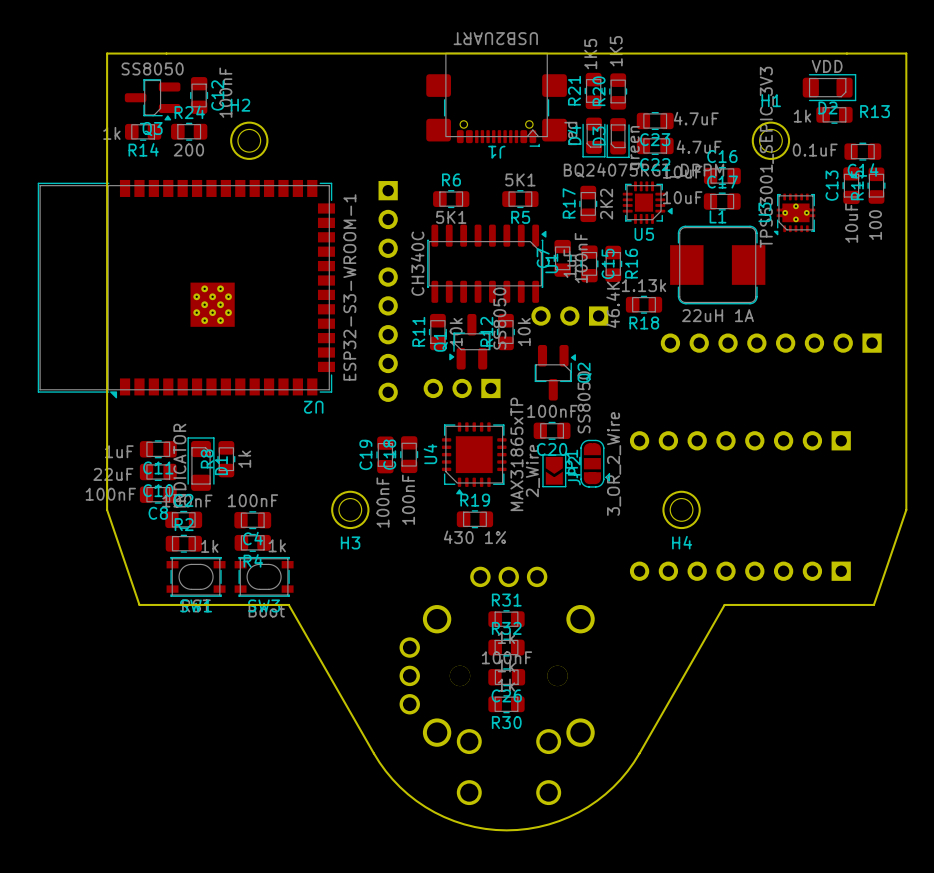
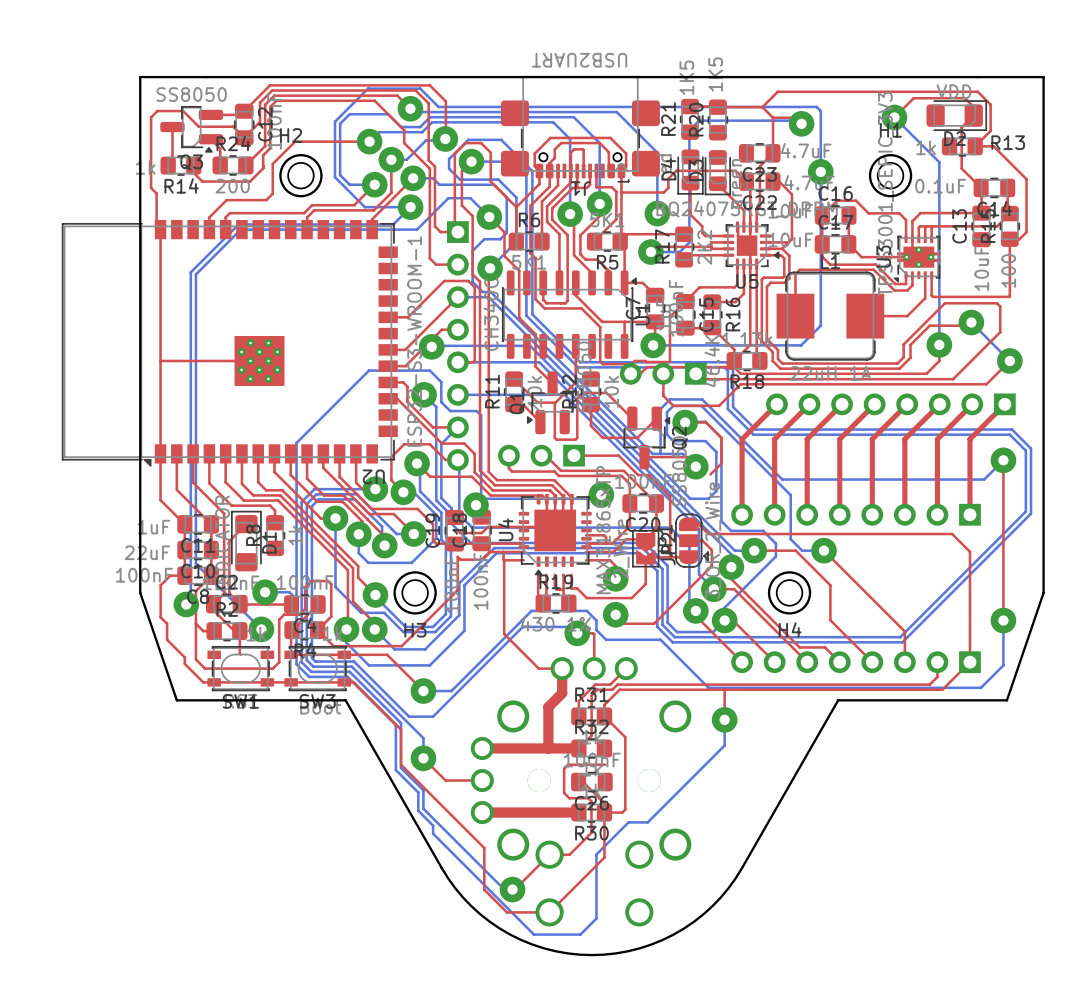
top track: none -> (690, 106) (762, 107)
top track: none -> (762, 107) (773, 117)
top track: none -> (762, 107) (777, 91) (977, 91) (990, 104) (990, 130) (975, 146) (993, 146) (1026, 179) (1026, 232) (1019, 239) (1009, 239) (1009, 296) (932, 296) (931, 275)
top track: none -> (410, 108) (397, 95) (274, 95) (265, 104) (265, 146) (245, 165)
bottom track: none -> (410, 108) (413, 112) (616, 112) (657, 152) (657, 213)
via: none -> (410, 108)
top track: none -> (210, 114) (240, 114) (270, 85) (429, 85) (445, 101) (445, 138)
top track: none -> (773, 117) (773, 153) (759, 166) (759, 207) (756, 210) (756, 227)
top track: none -> (773, 117) (795, 117) (801, 123)
top track: none -> (894, 117) (913, 98) (964, 98) (973, 106) (973, 115) (961, 127) (961, 168) (981, 188) (981, 213) (920, 213) (912, 221) (912, 250) (918, 257) (861, 257) (848, 244) (848, 215)
bottom track: none -> (894, 117) (939, 162) (939, 344)
via: none -> (894, 117)
bottom track: none -> (801, 123) (798, 120) (699, 120) (689, 130) (689, 242) (679, 252) (650, 252)
via: none -> (801, 123)
top track: none -> (172, 127) (172, 161) (168, 165)
top track: none -> (210, 139) (220, 148) (220, 165)
bottom track: none -> (445, 138) (426, 140) (406, 159) (391, 159)
via: none -> (445, 138)
top track: none -> (369, 141) (295, 141) (272, 163) (272, 193) (266, 200) (226, 200) (209, 217) (209, 229)
bottom track: none -> (369, 141) (379, 132) (422, 132) (432, 122) (553, 122) (570, 139) (570, 214)
via: none -> (369, 141)
top track: none -> (391, 159) (391, 192) (373, 210) (314, 210) (307, 217) (307, 229)
via: none -> (391, 159)
top track: none -> (471, 161) (461, 171) (461, 205) (472, 216) (472, 274) (480, 281) (480, 470) (494, 485) (552, 485) (563, 496) (563, 512)
bottom track: none -> (471, 161) (515, 161) (526, 172) (526, 315) (578, 367) (724, 367) (727, 370) (727, 409) (753, 434) (1009, 434) (1025, 450) (1025, 511) (900, 637) (674, 637) (662, 624) (662, 569) (642, 548) (494, 548) (459, 583) (459, 615) (425, 649) (394, 649) (374, 629)
via: none -> (471, 161)
top track: none -> (193, 165) (193, 172) (202, 181) (250, 181) (263, 168) (263, 155) (270, 148) (270, 106) (276, 100) (374, 100) (404, 130) (404, 143) (429, 168) (429, 258) (436, 264) (457, 264)
top track: none -> (558, 171) (558, 185) (542, 201) (542, 241)
top track: none -> (577, 171) (577, 187)
top track: none -> (583, 171) (583, 150) (574, 149) (570, 152) (570, 182) (547, 206) (547, 221) (559, 234) (559, 282)
top track: none -> (590, 171) (590, 184) (586, 187) (572, 187) (552, 208) (552, 219) (567, 235) (567, 301) (565, 303) (546, 303) (543, 299) (543, 282)
top track: none -> (596, 171) (596, 187) (611, 187) (616, 191) (616, 219) (594, 241)
top track: none -> (611, 171) (608, 168) (608, 152) (599, 143) (561, 143) (554, 149) (554, 158) (549, 163) (549, 186) (530, 205) (530, 253) (535, 258) (535, 299) (544, 308) (581, 308) (600, 327) (600, 361) (602, 364) (631, 364) (634, 360) (669, 362) (669, 316) (699, 287) (734, 287) (737, 284) (737, 264)
via: none -> (820, 171)
top track: none -> (413, 178) (372, 219) (372, 229)
bottom track: none -> (413, 178) (433, 178) (439, 184) (493, 184) (506, 197) (506, 232) (500, 239) (484, 239) (472, 250) (472, 282) (482, 292) (490, 292) (652, 453) (682, 453) (695, 466)
via: none -> (413, 178)
top track: none -> (773, 181) (779, 181) (791, 194) (791, 239) (782, 248)
top track: none -> (690, 183) (690, 214) (702, 226) (702, 232) (705, 236) (728, 236)
top track: none -> (717, 183) (743, 210) (743, 227)
top track: none -> (374, 184) (354, 205) (312, 205) (304, 213) (229, 213) (225, 217) (225, 229)
bottom track: none -> (374, 184) (349, 184) (340, 175) (340, 123) (349, 114) (388, 114) (401, 127) (420, 127) (430, 117) (573, 117) (599, 143) (599, 203)
via: none -> (374, 184)
top track: none -> (1007, 187) (1009, 213) (997, 226) (920, 226) (918, 239)
top track: none -> (621, 192) (663, 192) (668, 187) (668, 178) (676, 170) (735, 170) (750, 185) (750, 242)
top track: none -> (599, 203) (599, 216) (580, 235) (580, 254) (585, 259) (597, 259) (608, 270) (608, 282)
via: none -> (599, 203)
via: none -> (410, 207)
top track: none -> (516, 207) (516, 241)
top track: none -> (516, 207) (490, 181) (490, 152) (481, 143) (465, 143) (454, 153) (454, 228) (457, 232) (440, 232) (434, 226) (434, 166) (428, 160) (428, 103) (415, 90) (272, 90) (260, 102) (260, 122) (244, 137) (233, 126) (198, 126) (183, 111) (157, 111) (151, 117) (151, 187) (156, 193) (156, 225) (160, 229) (160, 500) (184, 524) (184, 575) (170, 575) (160, 585) (160, 617) (167, 623) (167, 639) (184, 657) (184, 663) (203, 682) (353, 682) (401, 729) (401, 764) (484, 848) (484, 889) (507, 912) (549, 912) (604, 857) (604, 803) (583, 782) (578, 782)
top track: none -> (516, 207) (539, 184) (539, 171) (534, 166) (534, 153) (550, 137) (610, 137) (626, 153) (626, 166) (621, 171) (621, 240)
top track: none -> (570, 214) (574, 218) (574, 255) (592, 273) (592, 282)
via: none -> (570, 214)
via: none -> (657, 213)
top track: none -> (489, 217) (504, 232) (504, 256) (519, 270) (519, 317) (535, 334) (535, 366) (552, 383)
bottom track: none -> (489, 217) (470, 198) (448, 198) (417, 229) (240, 229) (195, 274) (195, 563) (261, 629)
via: none -> (489, 217)
top track: none -> (926, 226) (925, 239)
top track: none -> (932, 226) (931, 239)
top track: none -> (737, 227) (738, 236) (750, 248) (750, 344) (728, 367) (646, 367) (630, 383)
top track: none -> (684, 234) (627, 234) (620, 241) (624, 246) (624, 282) (642, 282) (655, 295)
top track: none -> (906, 239) (906, 219) (899, 213) (868, 213) (856, 200) (837, 200) (822, 215) (822, 256) (830, 264) (875, 264) (895, 284) (906, 284) (906, 275)
top track: none -> (711, 242) (711, 248) (728, 248)
top track: none -> (711, 242) (728, 242)
top track: none -> (765, 242) (788, 242)
top track: none -> (711, 246) (656, 246) (650, 252)
top track: none -> (765, 248) (782, 248)
top track: none -> (782, 248) (789, 255) (789, 278) (785, 282) (770, 282) (766, 286) (766, 338) (777, 349) (777, 358) (782, 363) (897, 363) (903, 357) (903, 344) (944, 303) (997, 303) (1000, 306) (1000, 332) (953, 379) (700, 379) (695, 383) (695, 373)
via: none -> (650, 252)
top track: none -> (728, 255) (688, 255) (684, 259)
top track: none -> (765, 255) (781, 255) (784, 258) (782, 277) (763, 277) (761, 279) (761, 341) (772, 352) (772, 360) (780, 368) (899, 368) (910, 357) (910, 344) (929, 325) (968, 325) (971, 322)
top track: none -> (743, 264) (743, 293) (735, 302) (712, 302)
top track: none -> (756, 264) (756, 357) (759, 360)
top track: none -> (490, 268) (488, 471) (497, 480) (554, 480) (571, 497) (571, 512)
bottom track: none -> (490, 268) (516, 242) (516, 197) (498, 179) (459, 179) (449, 168) (449, 159) (468, 139) (501, 139) (532, 171) (532, 314) (580, 362) (726, 362) (733, 368) (733, 407) (755, 429) (1011, 429) (1030, 448) (1030, 513) (902, 642) (672, 642) (657, 626) (657, 571) (639, 553) (496, 553) (464, 585) (464, 630) (429, 665) (368, 665) (346, 642) (346, 629)
via: none -> (490, 268)
top track: none -> (912, 275) (912, 285) (907, 290) (894, 290) (873, 269) (799, 269) (795, 274) (795, 316)
top track: none -> (925, 275) (925, 298) (907, 316) (865, 316)
top track: none -> (575, 282) (575, 295) (602, 321) (655, 321) (655, 343) (653, 345)
top track: none -> (457, 297) (405, 349) (388, 349)
bottom track: none -> (457, 297) (488, 297) (690, 498) (708, 498) (716, 491) (716, 451) (705, 441) (673, 441) (666, 434) (666, 412) (673, 405) (701, 405) (790, 495) (790, 539) (802, 550) (823, 550)
top track: none -> (388, 317) (408, 317) (444, 280) (468, 280) (474, 287) (474, 360) (457, 362)
top track: none -> (624, 321) (624, 346)
bottom track: none -> (971, 322) (1009, 360)
via: none -> (971, 322)
top track: none -> (457, 329) (441, 329) (405, 366) (388, 366)
top track: none -> (685, 332) (685, 328) (712, 327) (734, 349) (734, 367) (740, 373) (926, 373) (939, 360) (939, 344)
bottom track: none -> (653, 345) (801, 345) (820, 325) (820, 111) (816, 106) (438, 106) (420, 88) (368, 88) (335, 121) (335, 177) (364, 207) (410, 207) (393, 224) (238, 224) (190, 272) (190, 600) (186, 604)
via: none -> (653, 345)
via: none -> (939, 344)
top track: none -> (575, 346) (575, 382) (554, 403) (554, 437) (556, 439) (575, 439) (577, 437) (577, 398) (582, 393) (606, 393) (632, 418)
bottom track: none -> (431, 346) (530, 345) (734, 550) (754, 550)
via: none -> (431, 346)
top track: none -> (160, 360) (259, 360)
top track: none -> (1009, 360) (986, 384) (740, 384) (719, 405) (673, 405) (663, 395) (663, 383)
via: none -> (1009, 360)
bottom track: none -> (457, 362) (539, 362) (731, 554) (731, 567)
top track: none -> (514, 379) (537, 402) (555, 402)
top track: none -> (388, 382) (403, 382) (407, 386) (407, 401) (433, 427) (457, 427)
bottom track: none -> (424, 394) (436, 406) (436, 500) (446, 510) (446, 537) (451, 542) (451, 616) (435, 632) (403, 632) (384, 612) (361, 612) (335, 587) (335, 518)
via: none -> (424, 394)
bottom track: none -> (457, 394) (564, 394) (699, 529) (699, 574) (713, 589)
top track: none -> (388, 398) (397, 398) (441, 443) (464, 443) (474, 453) (474, 472) (492, 490) (550, 490) (555, 495) (554, 512)
top track: none -> (514, 404) (523, 404) (540, 422)
top track: none -> (591, 404) (591, 426) (602, 437) (637, 437) (656, 418)
top track: none -> (776, 404) (742, 439) (742, 514)
top track: none -> (809, 404) (774, 439) (774, 514)
top track: none -> (842, 404) (807, 439) (807, 514)
top track: none -> (874, 404) (839, 439) (839, 514)
top track: none -> (907, 404) (872, 439) (872, 514)
top track: none -> (939, 404) (904, 439) (904, 514)
top track: none -> (972, 404) (937, 439) (937, 514)
top track: none -> (1004, 404) (969, 439) (969, 514)
top track: none -> (685, 422) (706, 422) (721, 437) (721, 463) (710, 474)
bottom track: none -> (685, 422) (705, 421) (721, 437) (721, 521) (731, 530) (763, 530) (775, 543) (775, 556) (724, 607) (724, 620) (713, 632) (676, 632) (667, 622) (667, 565) (644, 542) (470, 542) (451, 523) (451, 508) (441, 498) (441, 443) (457, 427)
via: none -> (685, 422)
top track: none -> (176, 453) (176, 489) (211, 524) (211, 575) (195, 591) (195, 659) (205, 668) (272, 668) (279, 662) (279, 619) (284, 614) (299, 614) (305, 609) (305, 587) (311, 581) (328, 581) (331, 584) (331, 616) (317, 630) (333, 646) (401, 646) (457, 590) (457, 556) (460, 559) (481, 559) (489, 551) (523, 551)
top track: none -> (193, 453) (193, 482) (224, 513) (224, 593) (213, 604) (213, 610) (239, 636) (240, 654)
top track: none -> (209, 453) (209, 483) (231, 505) (270, 505) (275, 510) (275, 522)
top track: none -> (225, 453) (225, 482) (243, 500) (278, 500) (347, 570) (346, 629)
top track: none -> (241, 453) (241, 483) (253, 495) (280, 495) (353, 568) (353, 601) (372, 620) (377, 623) (374, 629)
top track: none -> (258, 453) (258, 482) (266, 490) (282, 490) (358, 566) (358, 577) (375, 594)
top track: none -> (274, 453) (274, 472) (320, 518) (335, 518)
top track: none -> (290, 453) (290, 475) (317, 501) (342, 501)
top track: none -> (323, 453) (323, 467) (369, 514) (393, 514) (413, 534)
top track: none -> (339, 453) (339, 476) (371, 508) (417, 508) (433, 524) (433, 540) (436, 543) (523, 543)
top track: none -> (355, 453) (356, 482) (362, 489) (375, 489)
bottom track: none -> (660, 453) (660, 409) (670, 399) (702, 399) (782, 479) (984, 479) (1003, 460)
top track: none -> (306, 454) (307, 478) (324, 495) (343, 495) (384, 536) (384, 545)
top track: none -> (508, 455) (508, 468) (512, 471) (554, 471) (558, 475) (621, 475) (629, 484) (629, 526) (612, 543) (586, 543)
top track: none -> (541, 455) (545, 455) (560, 470) (623, 470) (656, 503) (656, 528) (645, 539)
top track: none -> (574, 455) (618, 455) (638, 475) (648, 475) (670, 496) (670, 557)
top track: none -> (644, 457) (692, 457) (695, 460) (695, 466)
top track: none -> (457, 459) (445, 459) (429, 444) (404, 444) (391, 457) (391, 480) (403, 492)
bottom track: none -> (457, 459) (459, 514) (472, 527) (670, 527) (689, 546) (689, 604) (695, 610)
top track: none -> (1003, 460) (1003, 620)
via: none -> (1003, 460)
top track: none -> (417, 463) (430, 476) (471, 476) (490, 495) (542, 495) (546, 500) (546, 512)
bottom track: none -> (417, 463) (420, 466) (420, 491) (441, 512) (441, 539) (445, 544) (445, 614) (433, 626) (405, 626) (375, 594)
via: none -> (417, 463)
via: none -> (695, 466)
bottom track: none -> (375, 489) (314, 489) (301, 501) (301, 662) (311, 671) (349, 671) (401, 723) (401, 767) (423, 790) (423, 808) (504, 889) (512, 889)
via: none -> (375, 489)
bottom track: none -> (403, 492) (413, 492) (436, 514) (436, 538) (411, 562) (368, 562) (358, 553) (358, 534)
via: none -> (403, 492)
bottom track: none -> (601, 494) (597, 498) (482, 498) (475, 505)
via: none -> (601, 494)
bottom track: none -> (481, 500) (481, 415) (476, 411) (450, 411) (441, 402) (441, 382) (429, 370) (368, 370) (296, 443) (296, 664) (309, 676) (347, 676) (395, 725) (395, 770) (418, 792) (418, 810) (433, 825) (433, 833) (533, 934) (580, 934) (596, 918) (596, 854) (628, 822) (647, 822) (724, 745) (724, 719)
top track: none -> (342, 501) (362, 521) (358, 524) (358, 534)
via: none -> (475, 505)
top track: none -> (538, 512) (538, 526) (488, 526) (481, 533) (460, 533) (457, 530)
via: none -> (335, 518)
top track: none -> (688, 524) (698, 524) (708, 534) (952, 534) (969, 551) (969, 662) (942, 689) (619, 689) (604, 704) (604, 716) (625, 737) (625, 809) (622, 812) (604, 812)
top track: none -> (246, 524) (229, 541) (229, 593) (240, 604) (285, 604) (291, 598)
bottom track: none -> (413, 534) (396, 534) (356, 494) (316, 494) (306, 504) (306, 660) (313, 666) (351, 666) (423, 738) (423, 758)
via: none -> (413, 534)
via: none -> (358, 534)
top track: none -> (586, 535) (604, 535) (606, 543)
top track: none -> (645, 539) (626, 539) (613, 551) (586, 551)
top track: none -> (688, 540) (702, 540) (711, 550) (711, 566) (654, 623) (624, 623) (615, 614)
bottom track: none -> (384, 545) (382, 543) (382, 526) (354, 499) (318, 499) (311, 506) (311, 657) (315, 661) (353, 661) (409, 716) (433, 716) (522, 626) (570, 626) (577, 633)
via: none -> (384, 545)
top track: none -> (754, 550) (795, 550) (830, 585) (830, 620) (872, 662)
via: none -> (754, 550)
top track: none -> (823, 550) (904, 631) (904, 662)
via: none -> (823, 550)
top track: none -> (503, 551) (504, 560)
top track: none -> (688, 557) (646, 557) (645, 584) (631, 598) (586, 598) (577, 588) (571, 588) (571, 574)
top track: none -> (504, 560) (523, 560)
top track: none -> (504, 560) (504, 633) (538, 668) (562, 668) (562, 693) (548, 707) (548, 748)
top track: none -> (586, 560) (609, 560) (615, 566) (615, 578)
top track: none -> (731, 567) (731, 579) (799, 647) (825, 647) (839, 662)
via: none -> (731, 567)
top track: none -> (546, 574) (546, 600) (543, 603) (538, 598) (538, 574) (538, 578)
top track: none -> (554, 574) (554, 587) (556, 589) (563, 589)
top track: none -> (563, 574) (563, 598) (568, 603)
via: none -> (615, 578)
top track: none -> (713, 589) (734, 589) (807, 662)
via: none -> (713, 589)
bottom track: none -> (265, 592) (289, 592) (296, 599)
via: none -> (265, 592)
via: none -> (375, 594)
top track: none -> (318, 598) (318, 604) (291, 631) (291, 654) (387, 654) (423, 691)
via: none -> (186, 604)
top track: none -> (695, 610) (695, 615) (742, 662)
via: none -> (695, 610)
via: none -> (615, 614)
top track: none -> (724, 620) (732, 620) (774, 662)
via: none -> (724, 620)
bottom track: none -> (1003, 620) (1003, 665) (981, 687) (708, 687) (660, 639) (606, 639) (596, 630) (596, 620) (586, 610) (531, 610) (451, 691) (423, 691)
via: none -> (1003, 620)
top track: none -> (195, 623) (203, 631) (208, 631)
via: none -> (261, 629)
via: none -> (346, 629)
via: none -> (374, 629)
top track: none -> (577, 633) (594, 634) (594, 668)
via: none -> (577, 633)
top track: none -> (937, 662) (937, 676) (929, 684) (617, 684) (612, 689) (597, 689) (591, 695) (591, 735) (578, 748) (482, 748)
top track: none -> (626, 668) (610, 684) (595, 684) (578, 701) (578, 716)
top track: none -> (724, 689) (724, 719)
via: none -> (423, 691)
via: none -> (724, 719)
top track: none -> (423, 758) (445, 780) (482, 780)
via: none -> (423, 758)
top track: none -> (605, 764) (568, 764) (564, 768) (564, 792) (569, 798) (588, 798) (591, 801) (591, 832) (569, 854) (549, 854) (514, 889) (512, 889)
top track: none -> (482, 812) (578, 812)
via: none -> (512, 889)

